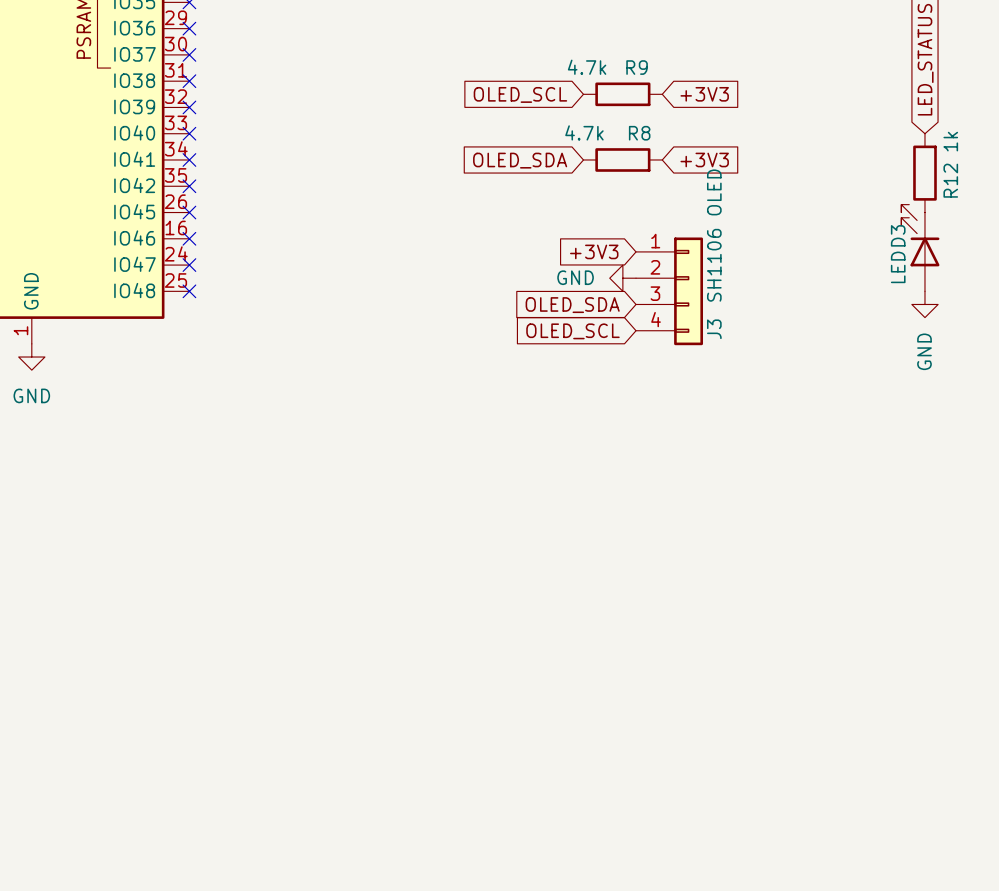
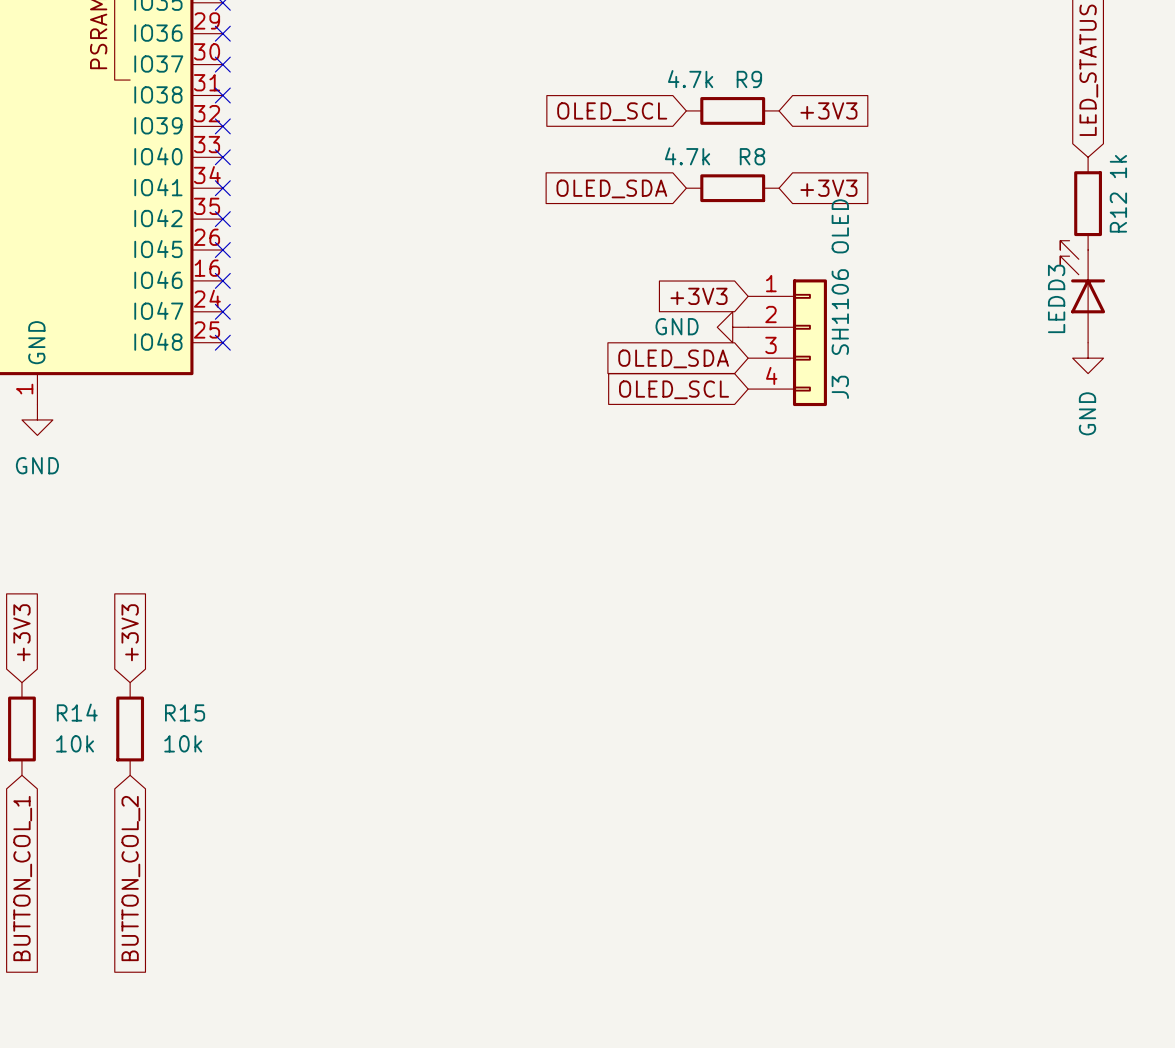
global label: none -> +3V3 (21, 632)
global label: none -> +3V3 (130, 632)
R14: none -> 10k (21, 728)
R15: none -> 10k (130, 728)
global label: none -> BUTTON_COL_1 (22, 878)
global label: none -> BUTTON_COL_2 (130, 878)

